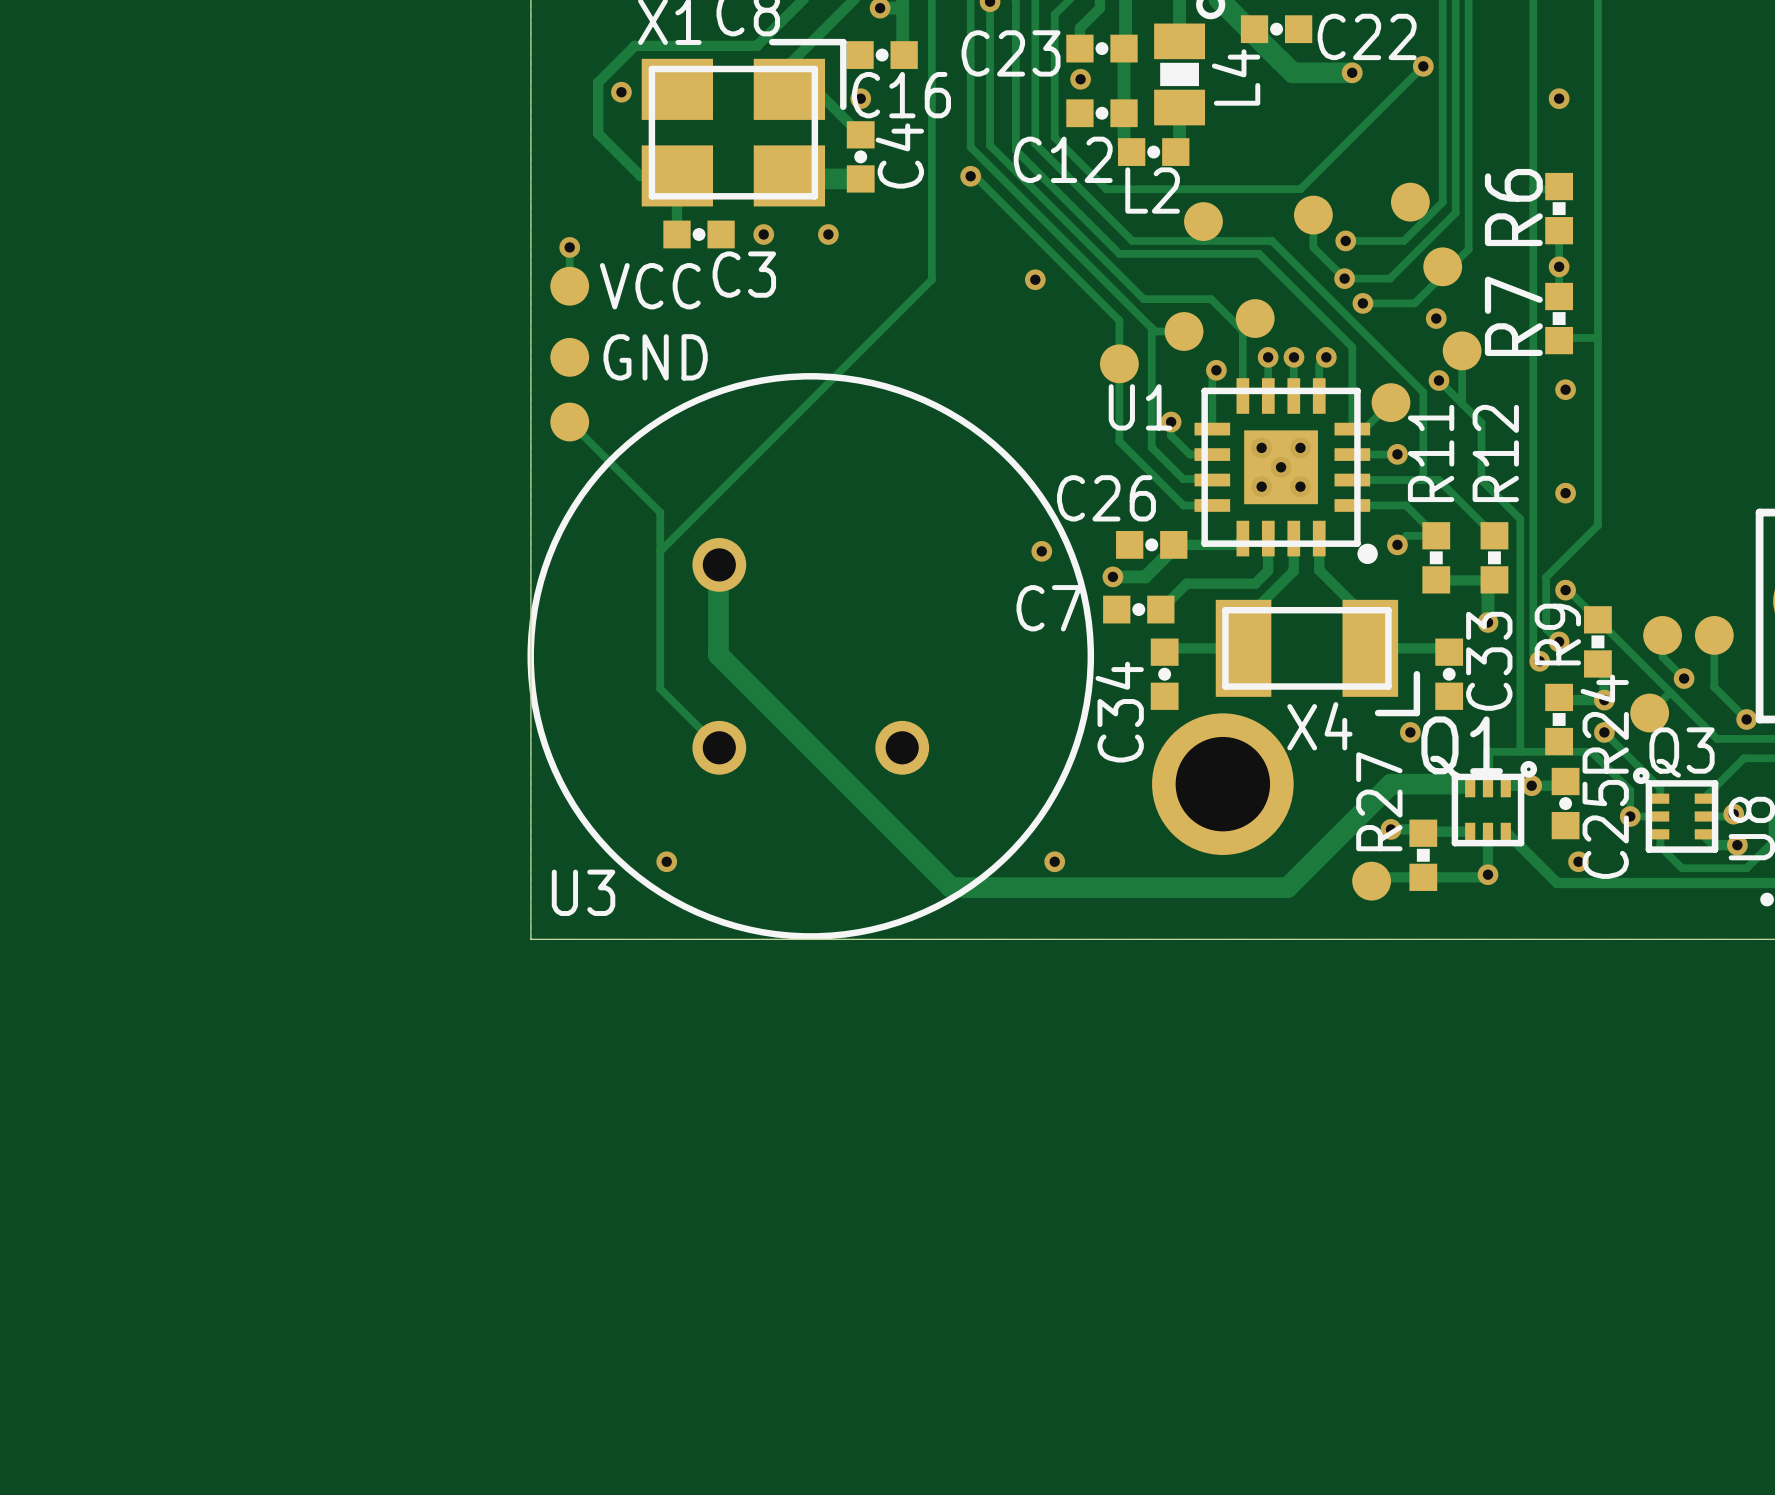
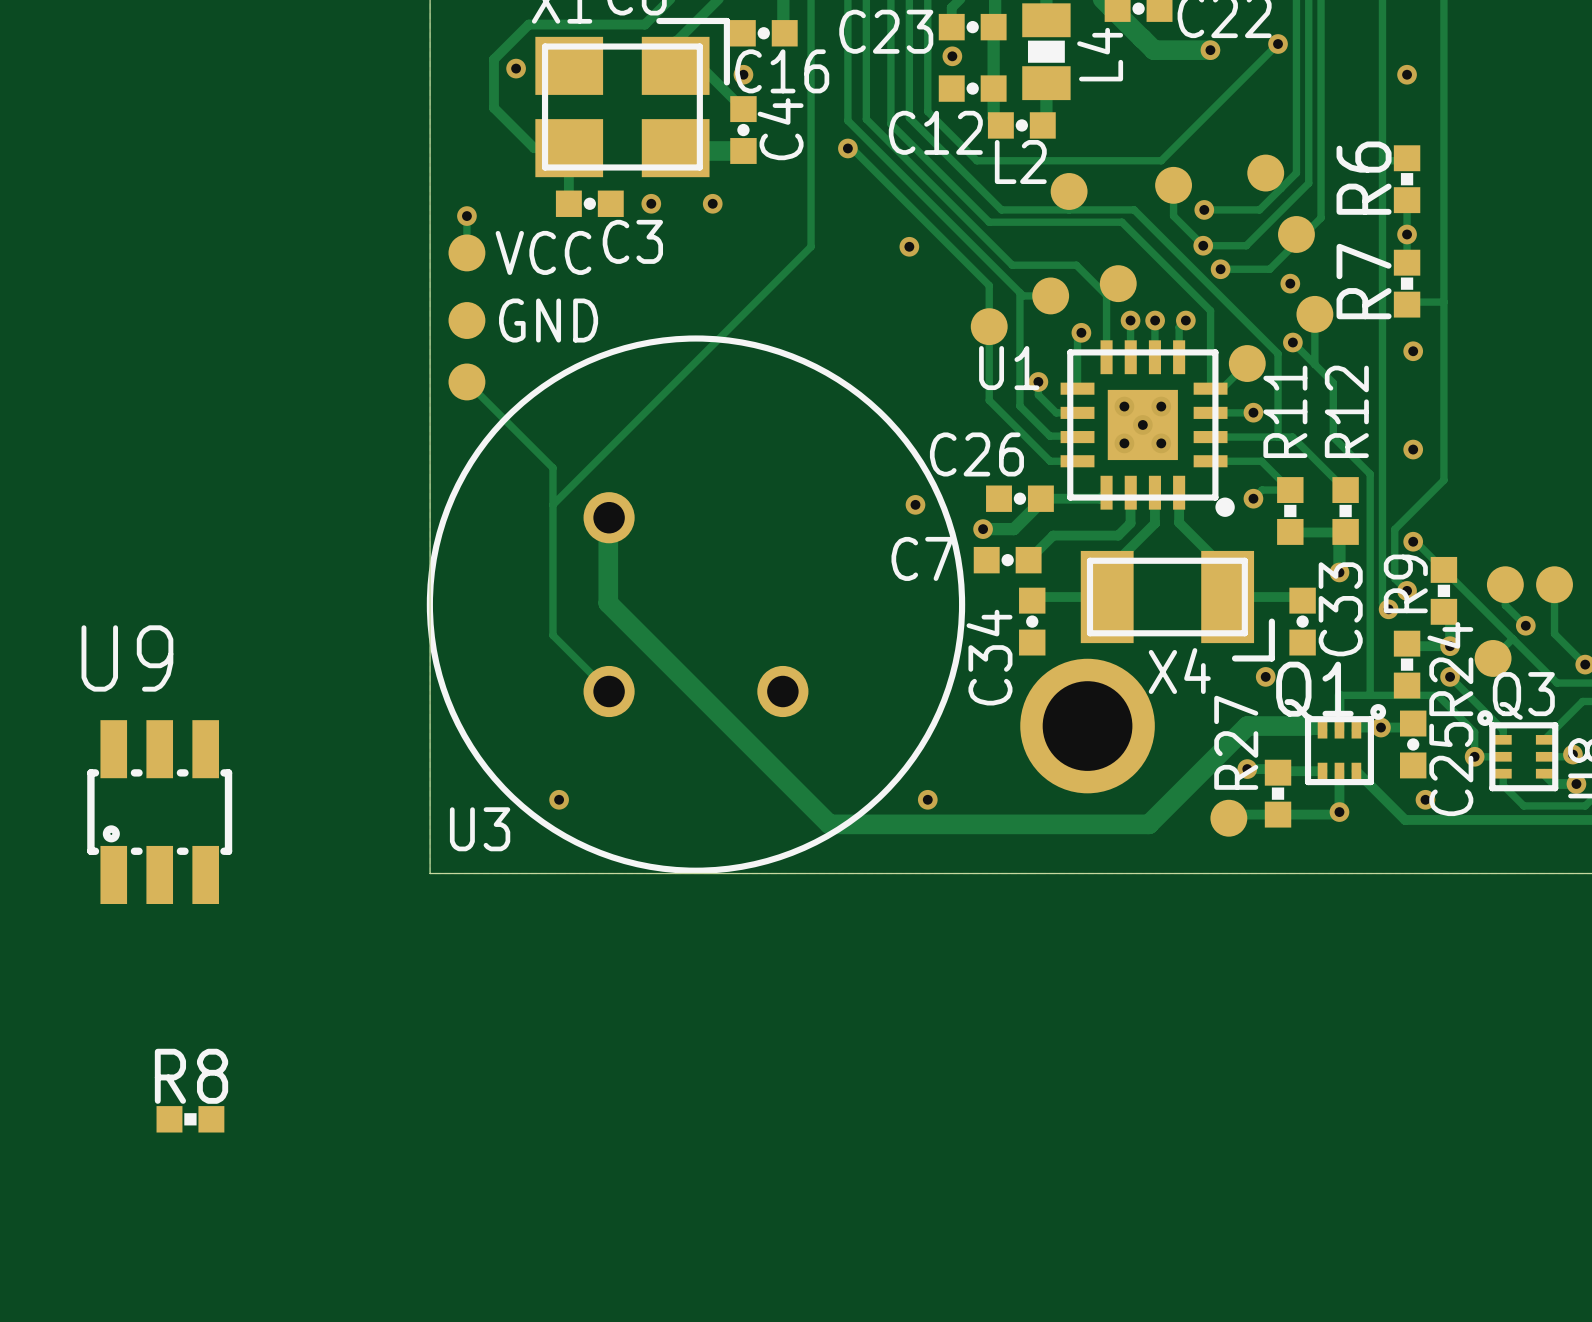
U9: none -> (159, 812)
R8: none -> (190, 1119)

